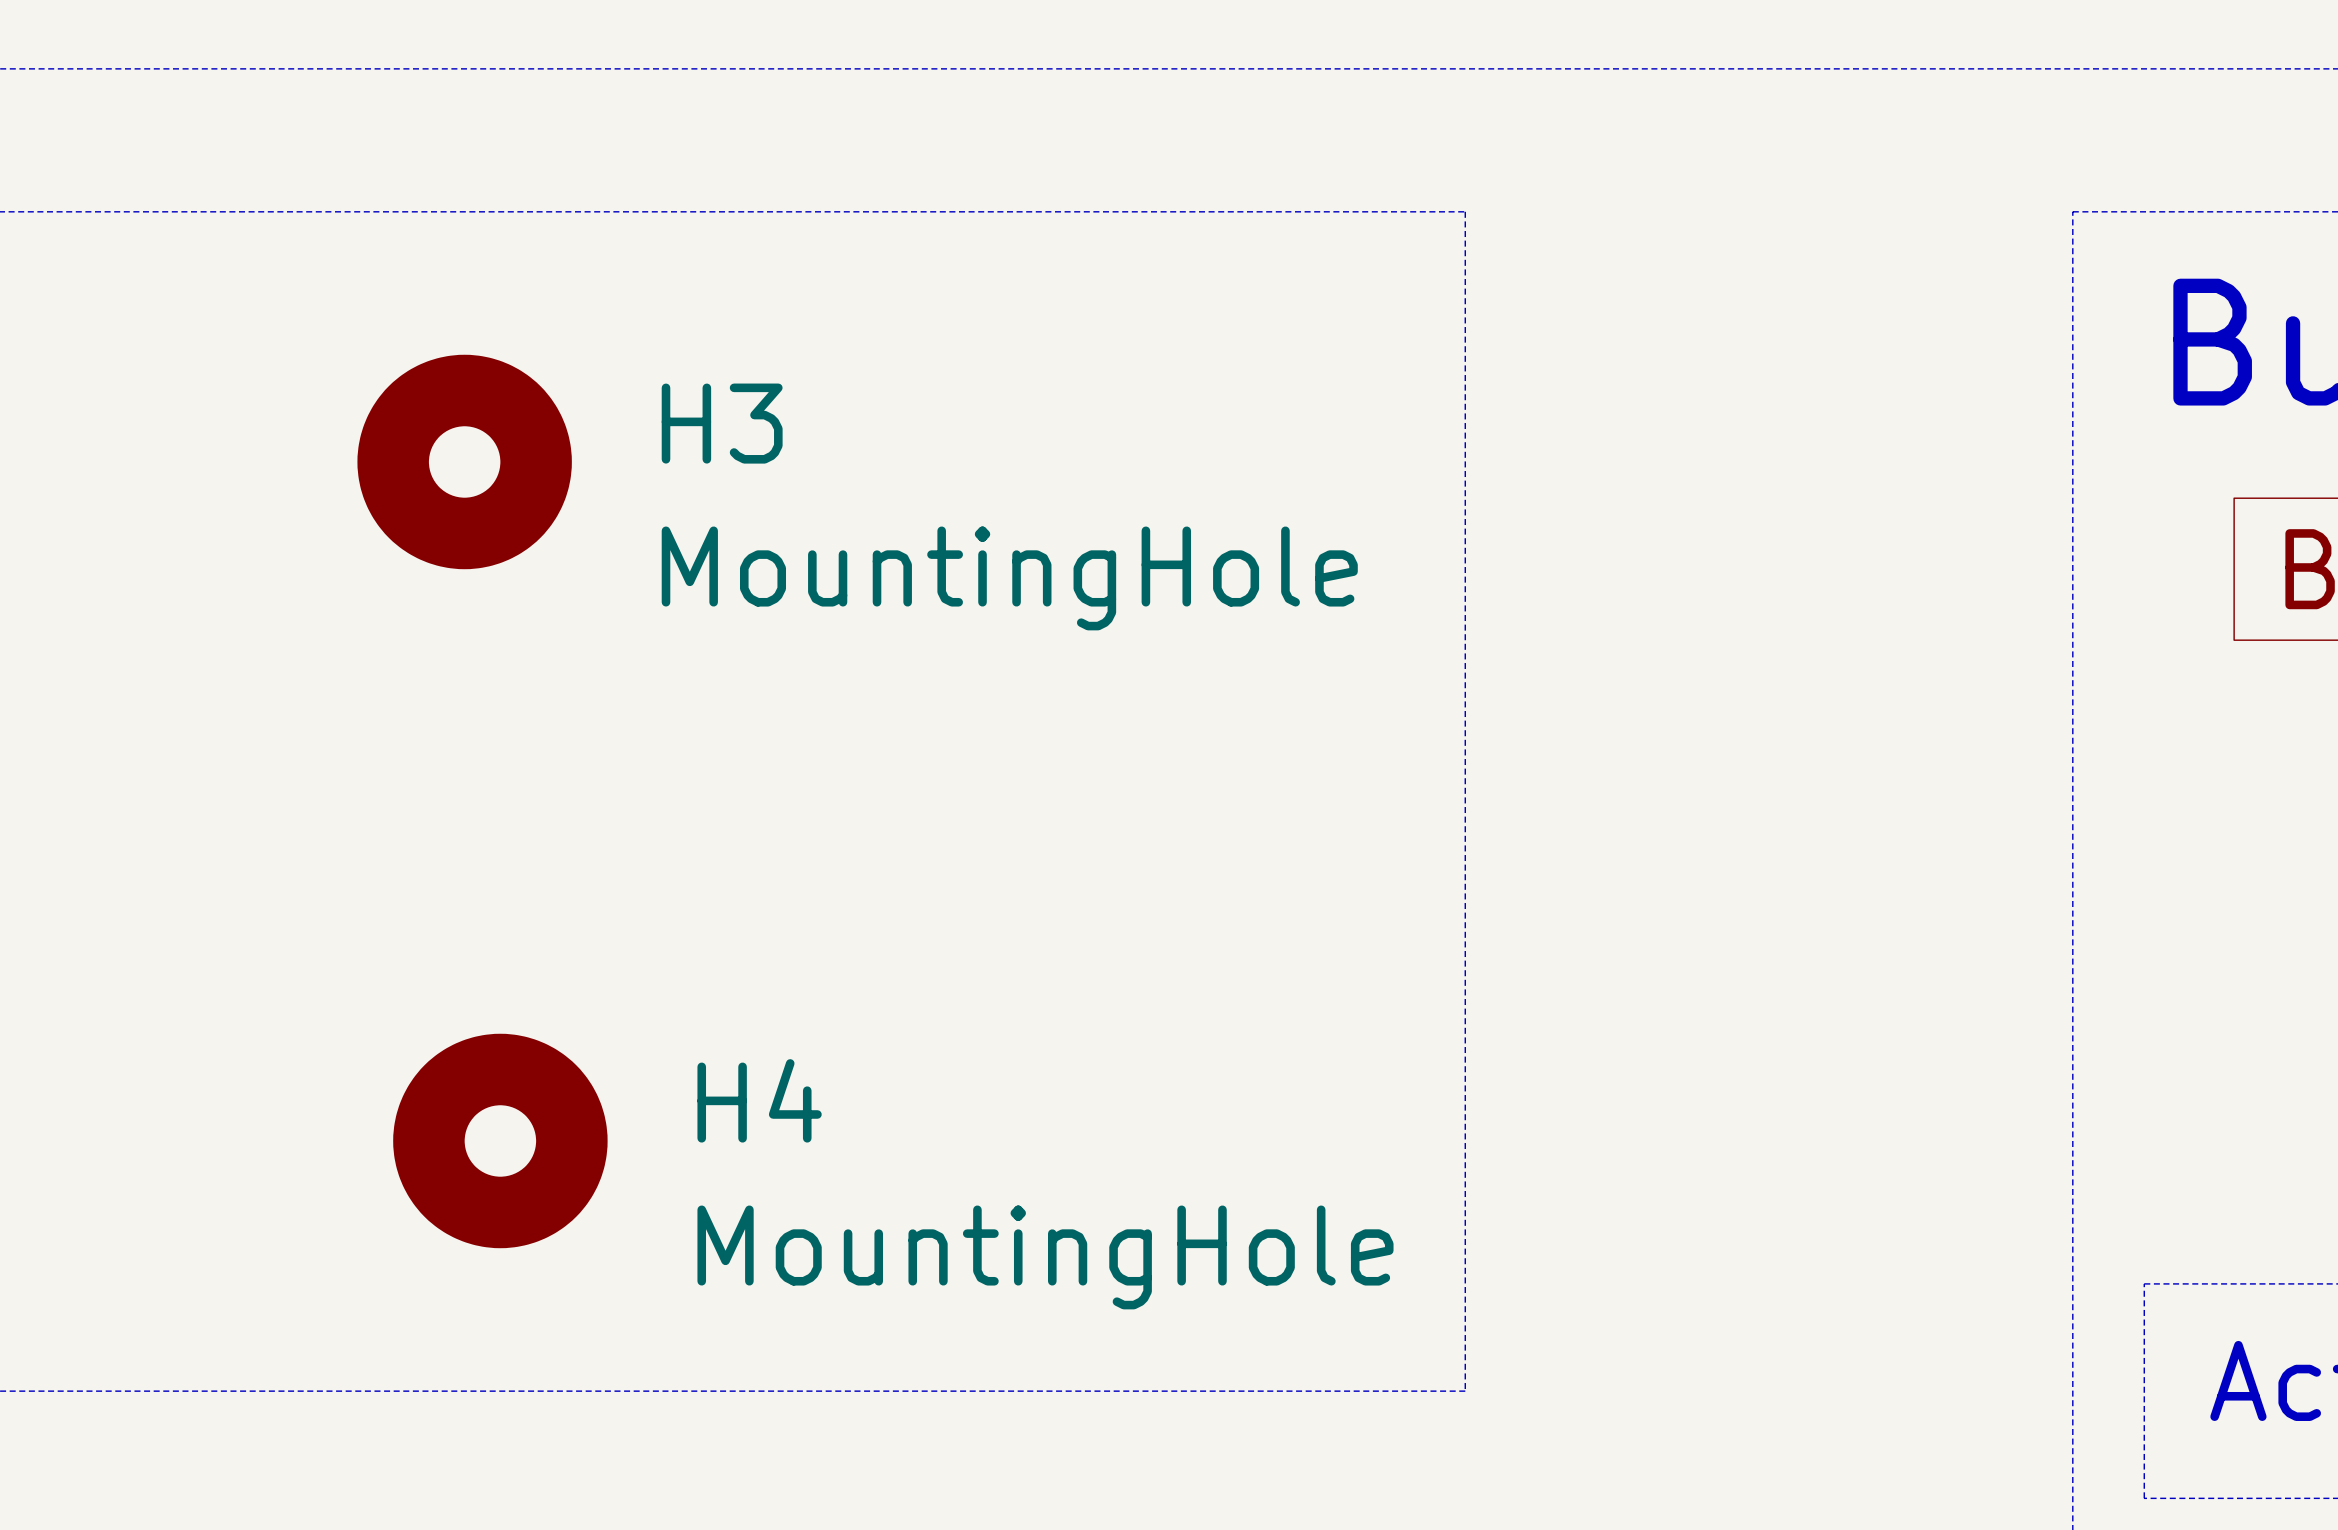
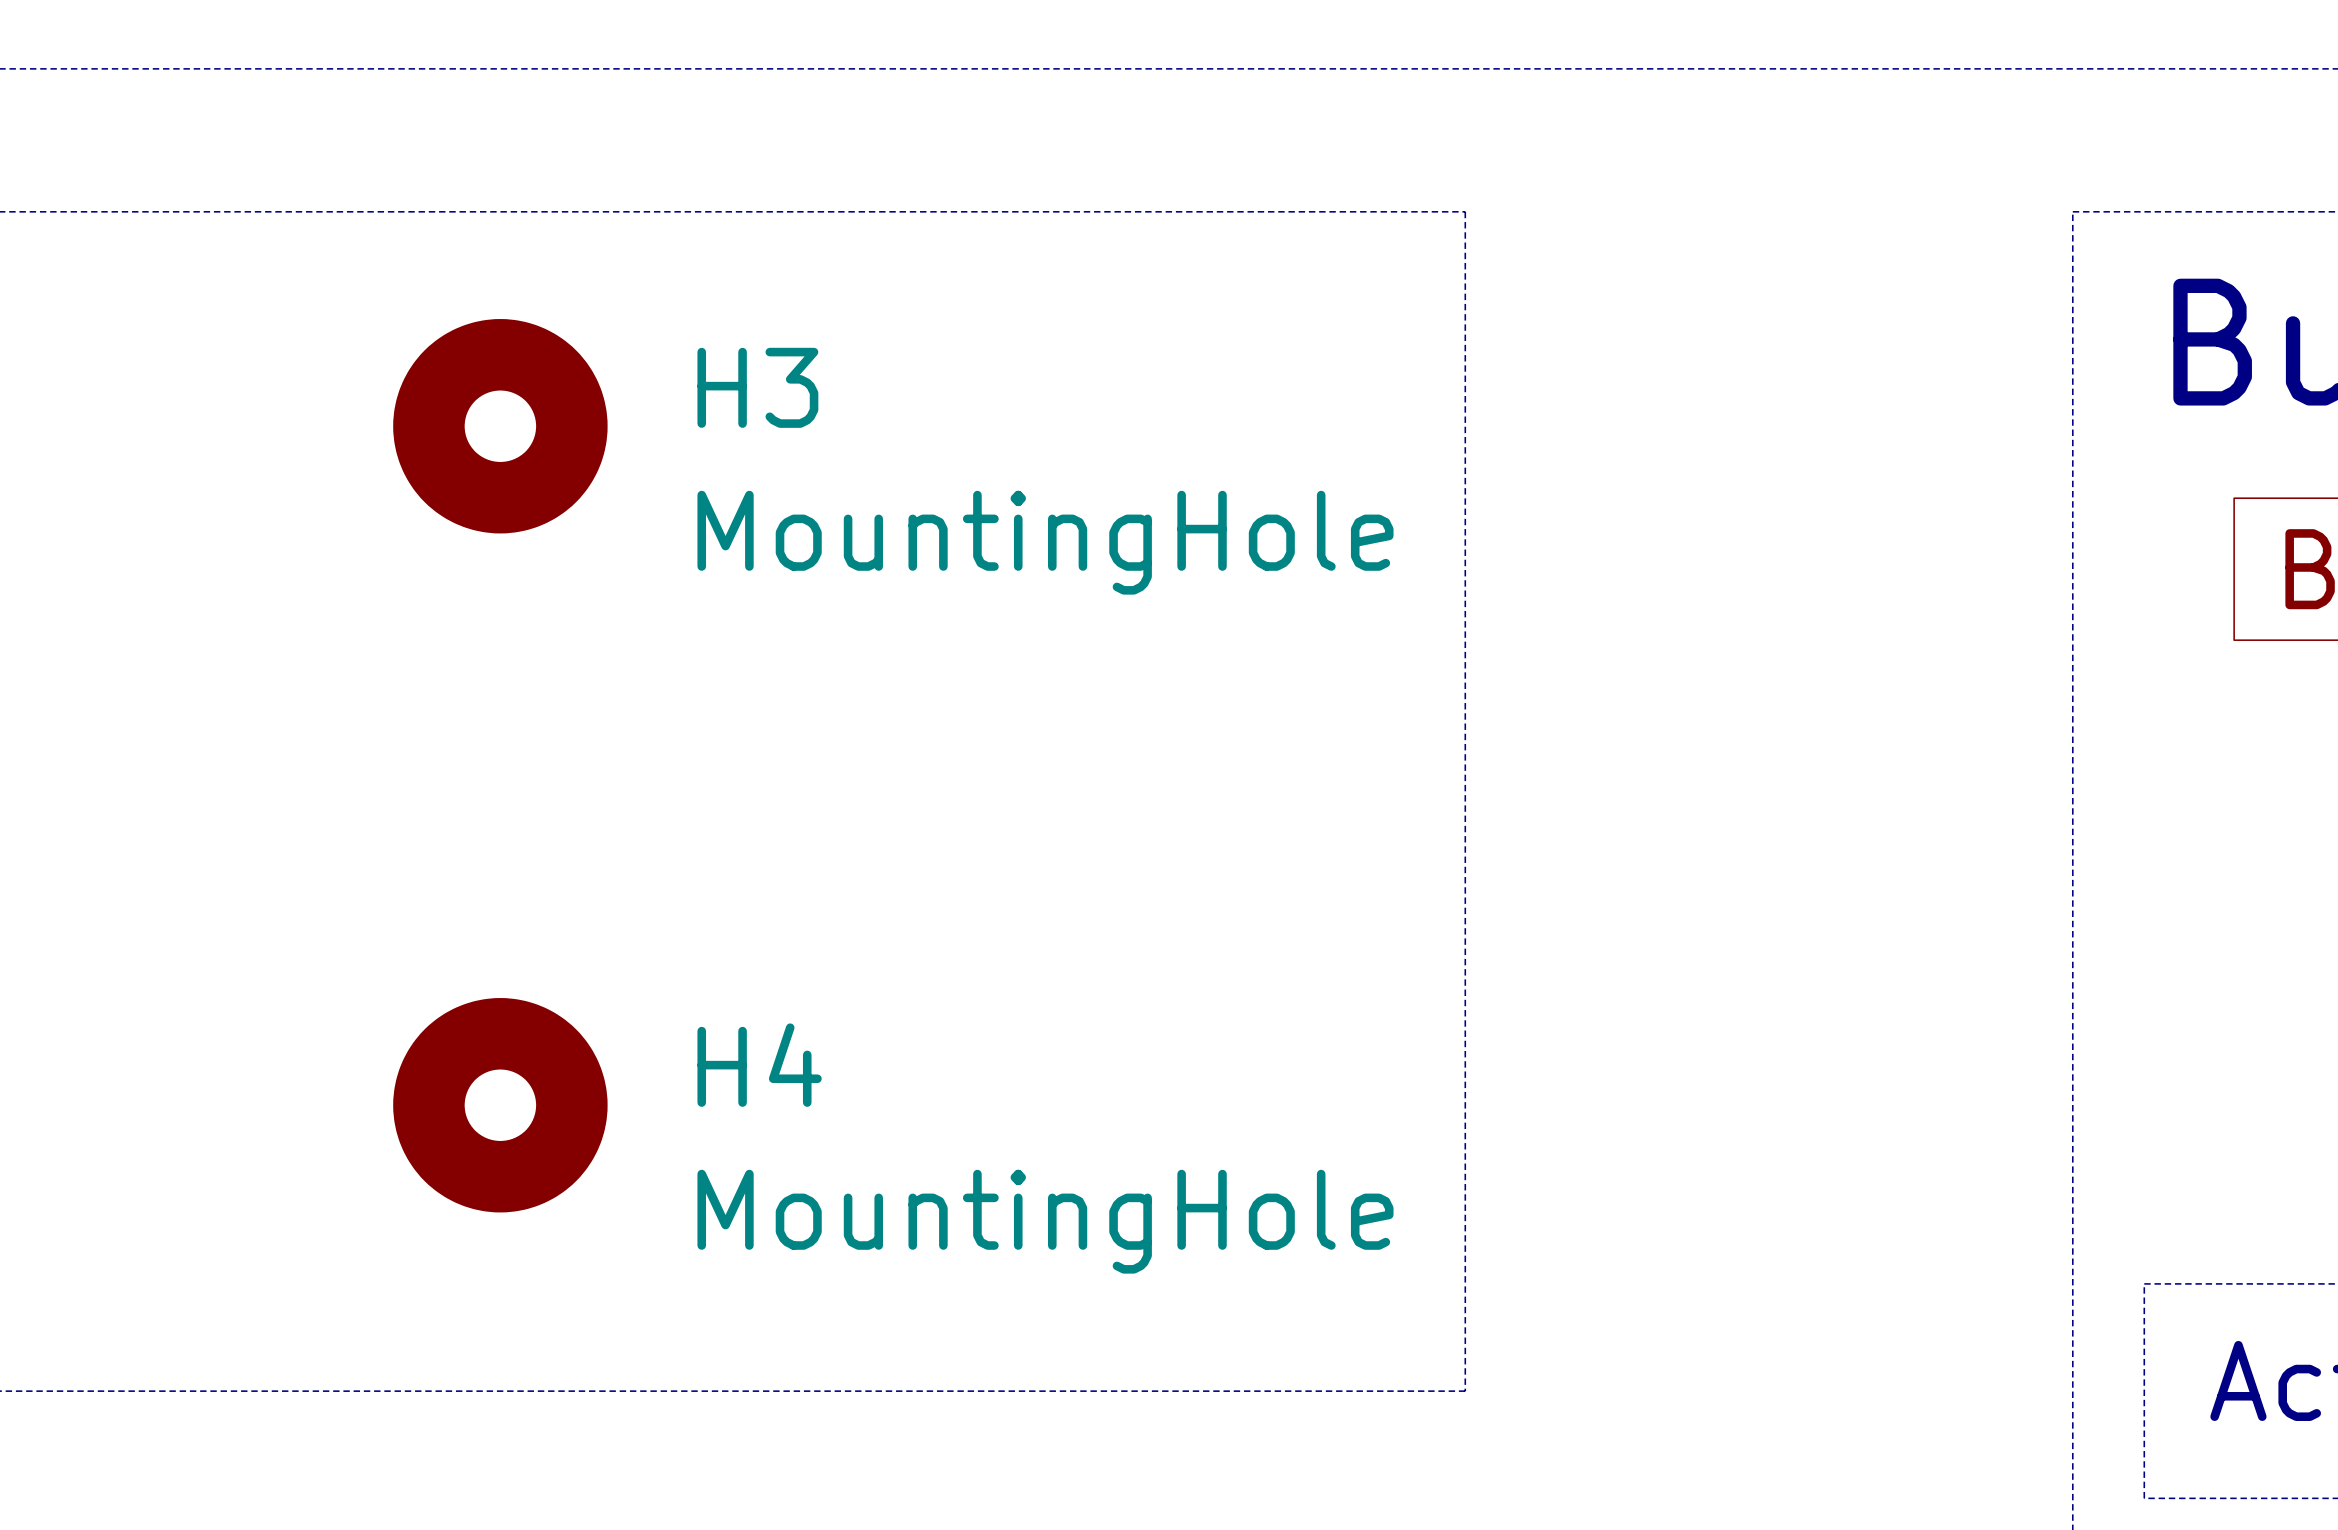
H3 position: (464, 461) -> (500, 426)
H4 position: (500, 1140) -> (500, 1105)

